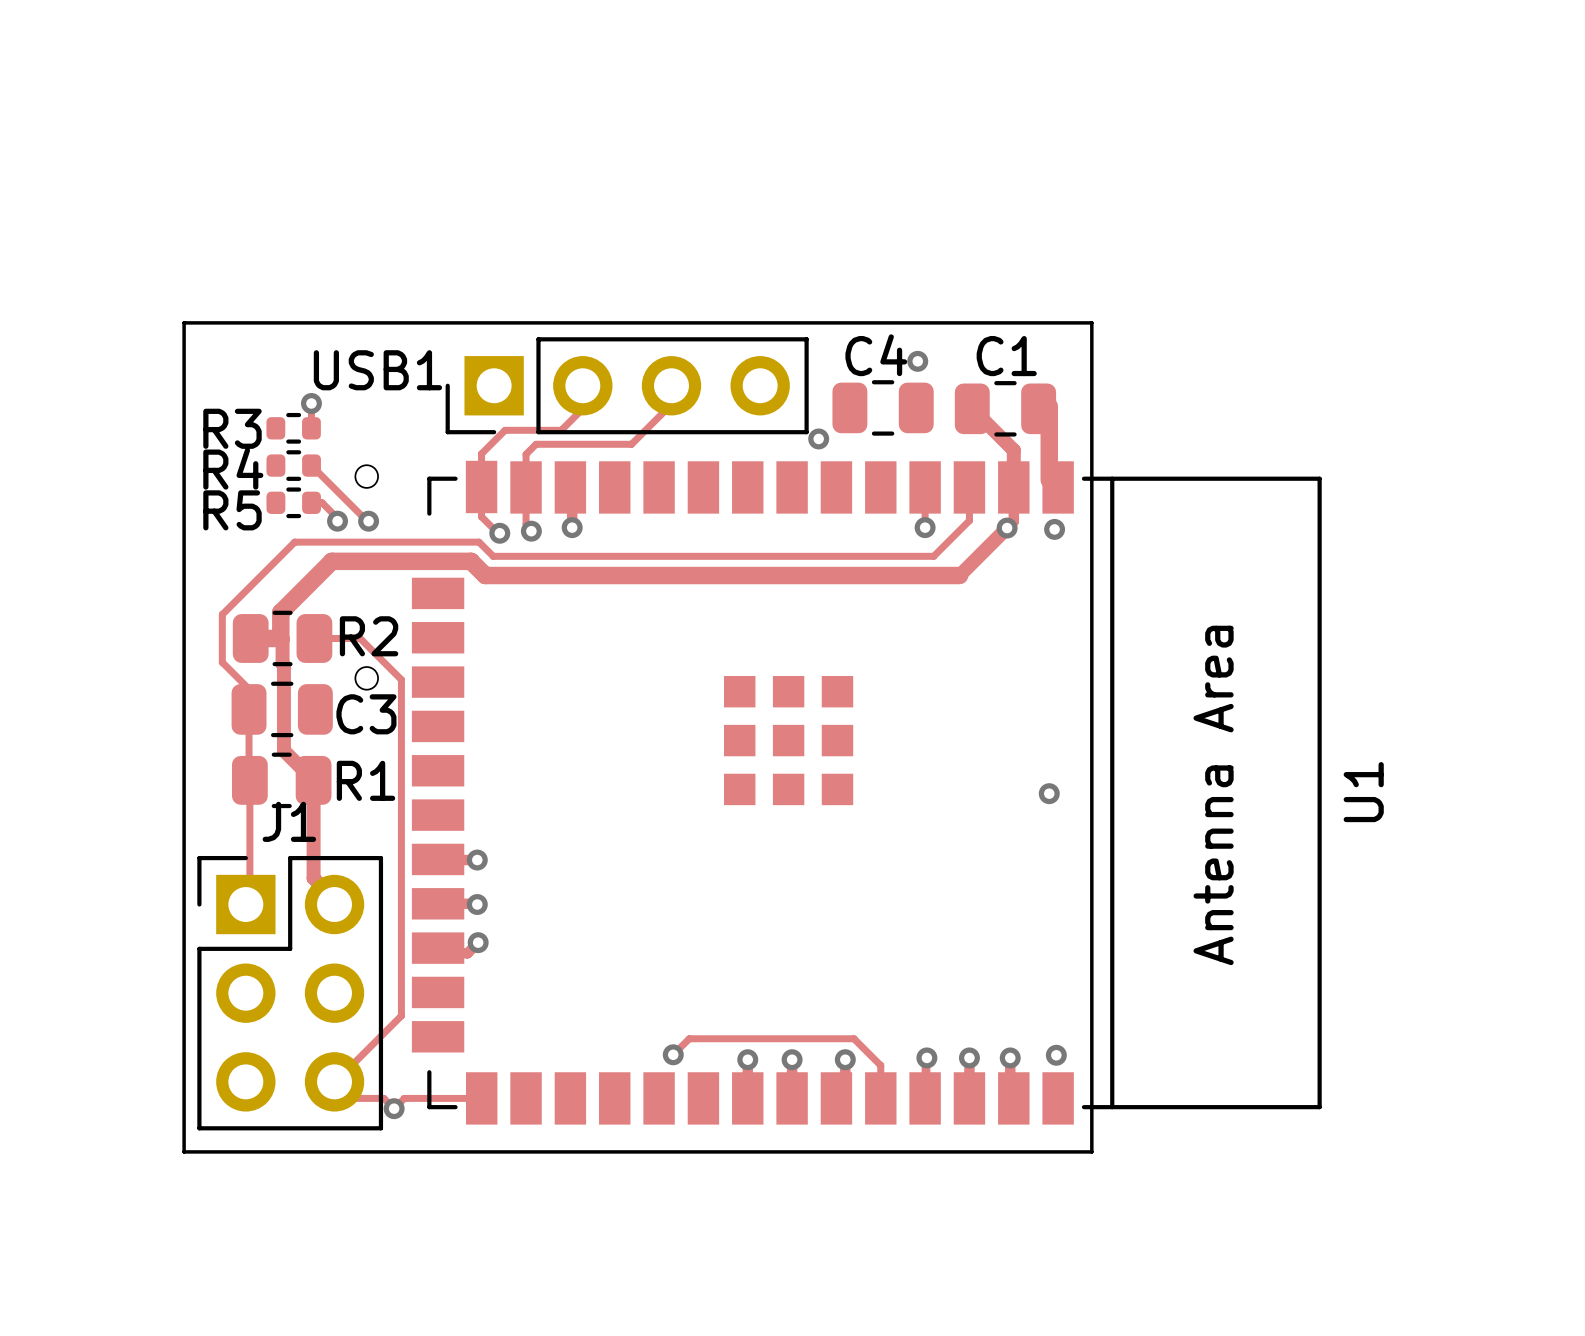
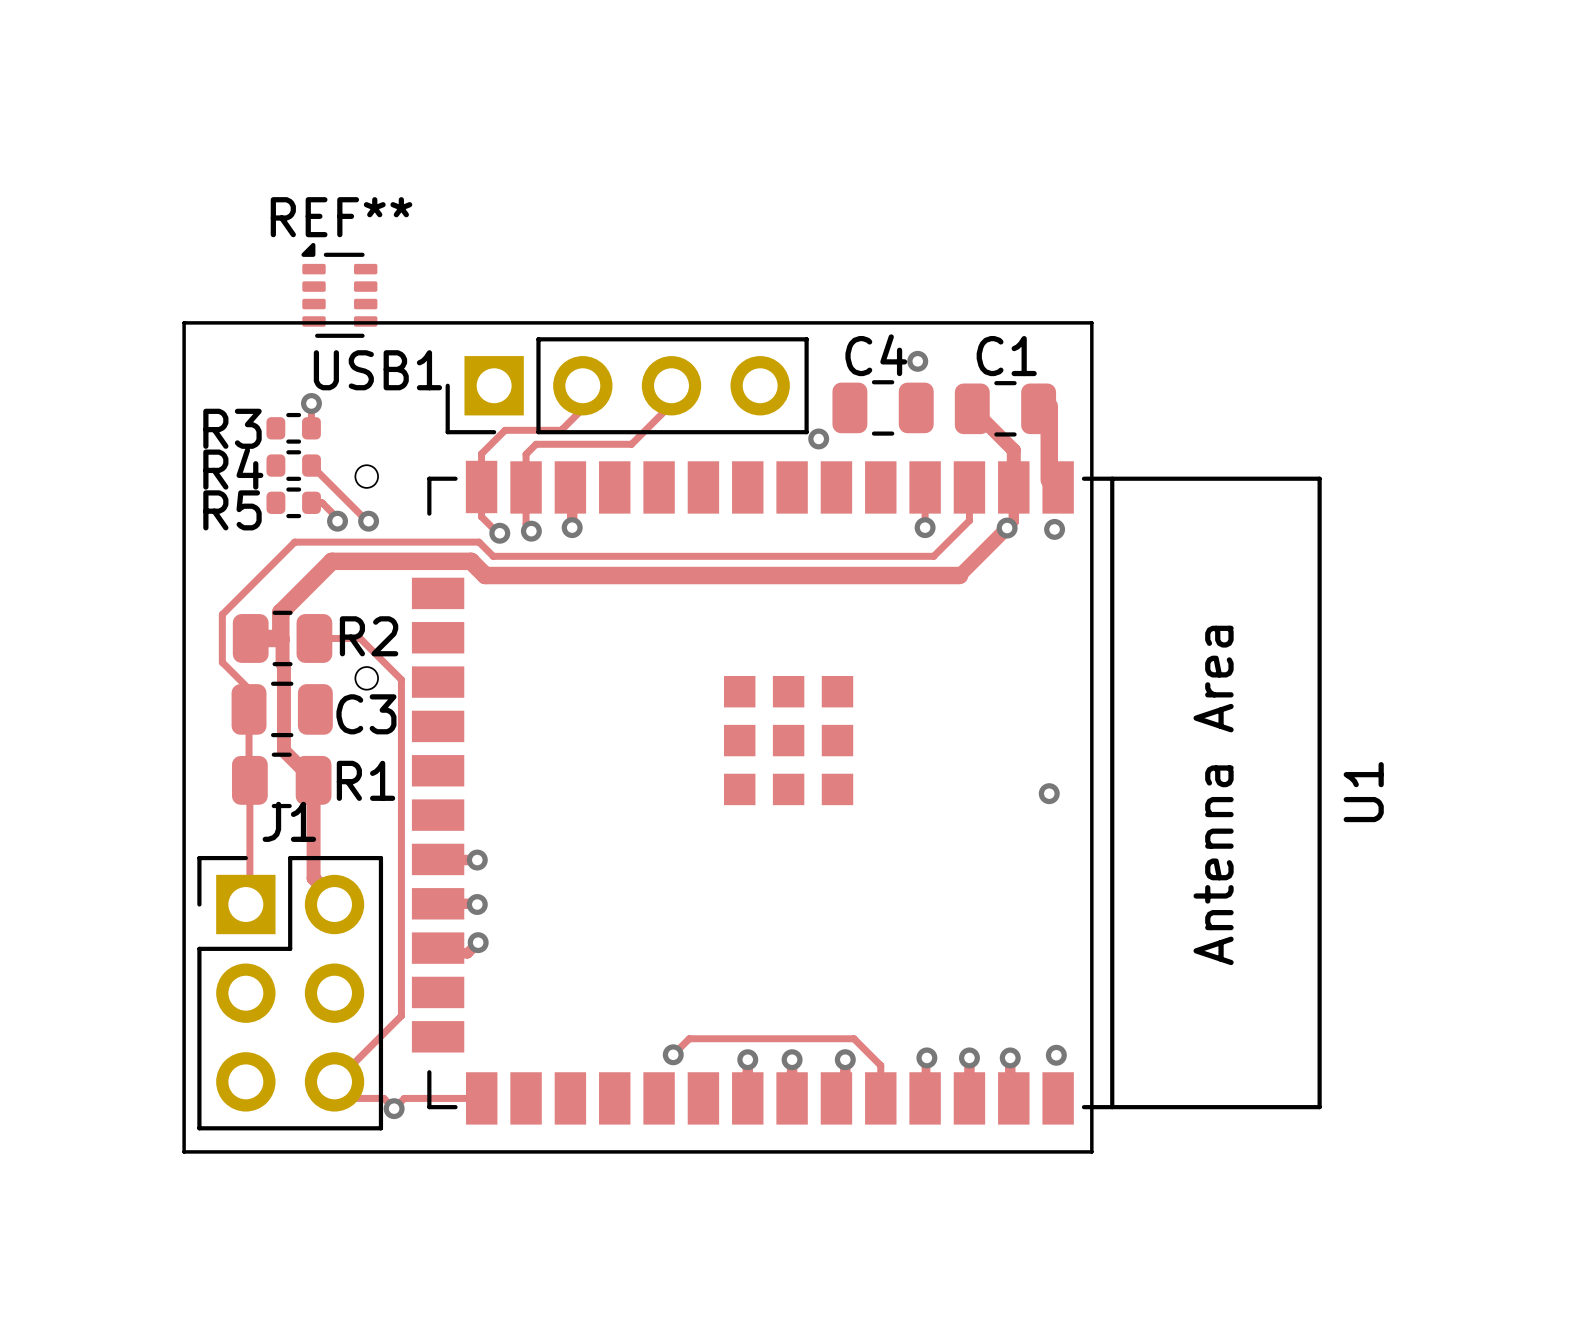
REF**: none -> (339, 290)

